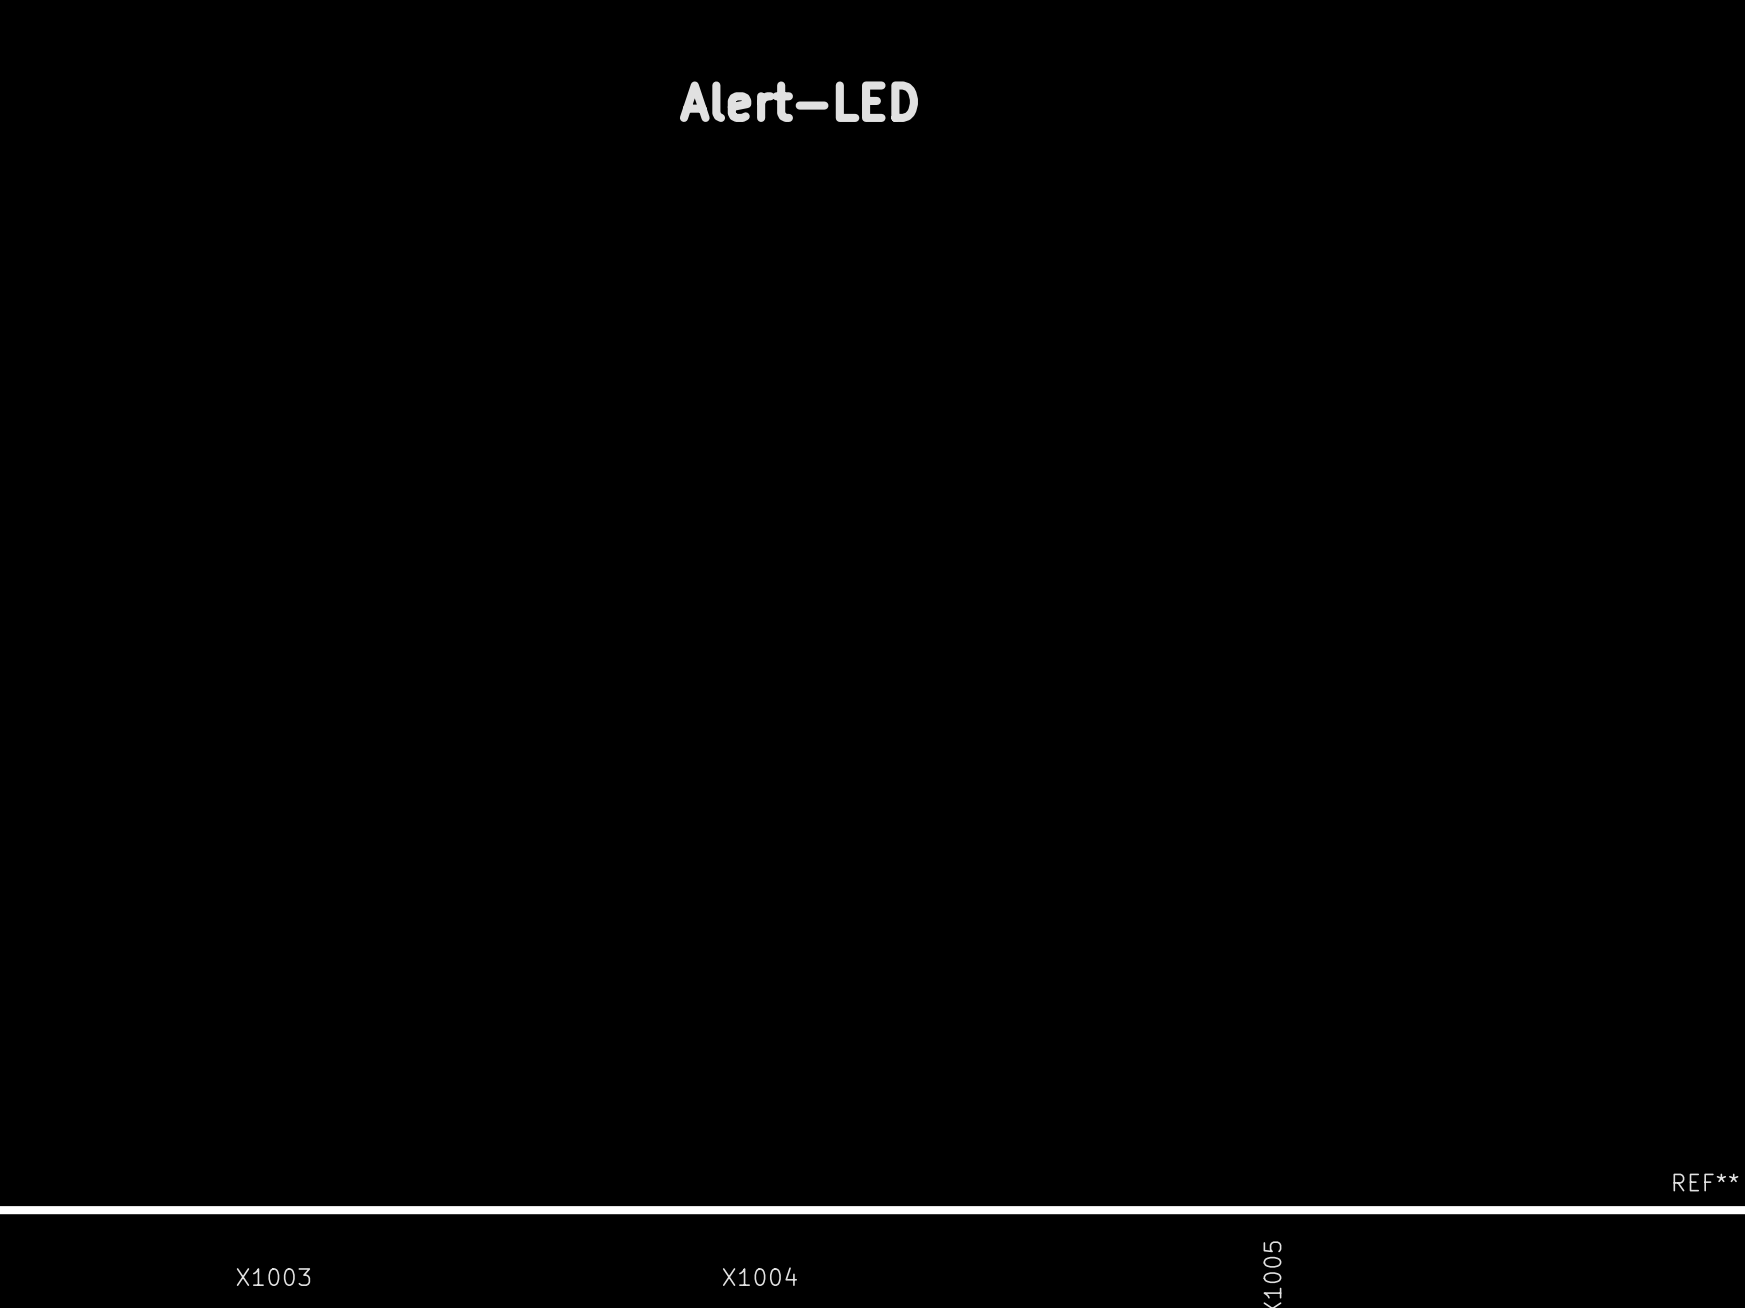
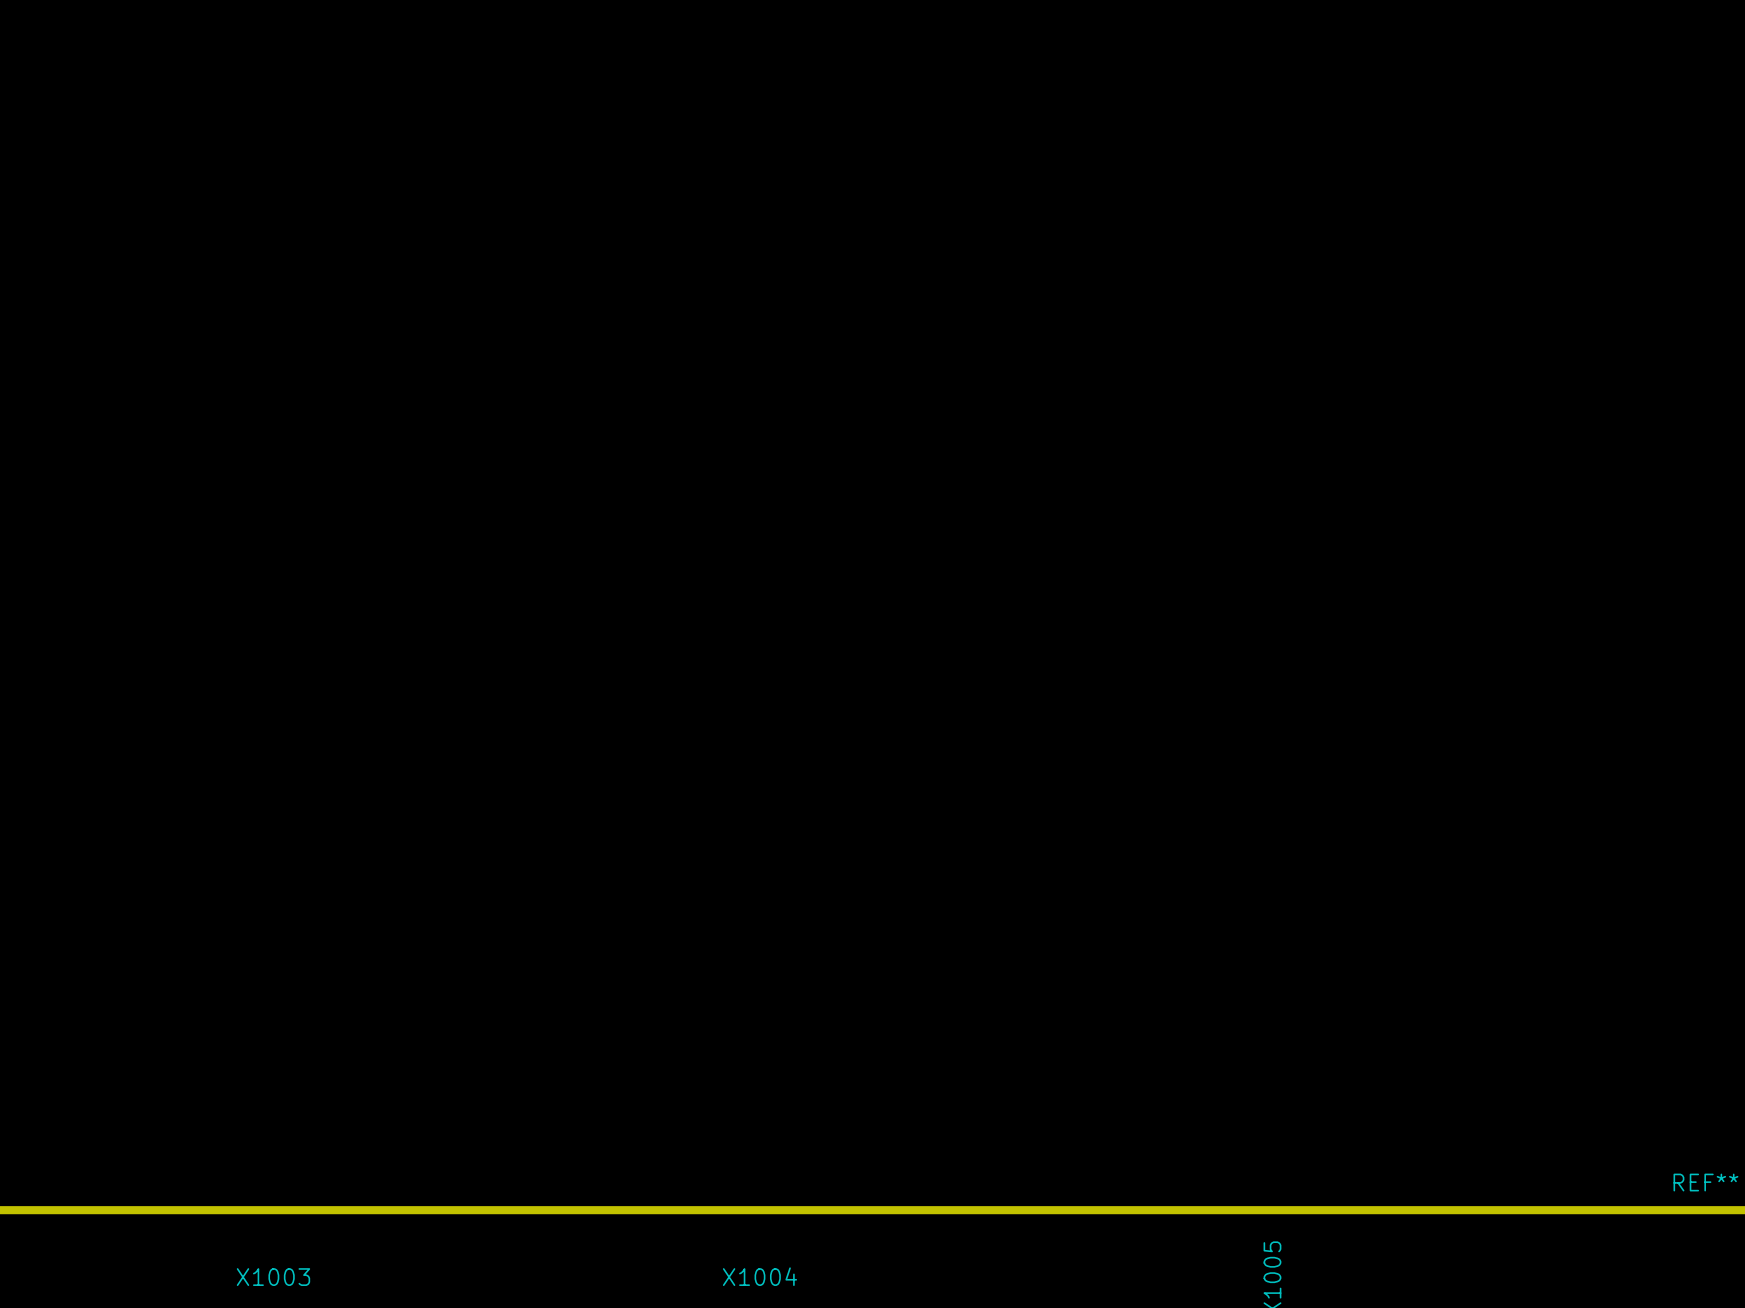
text: Alert-LED (798, 101) -> none

